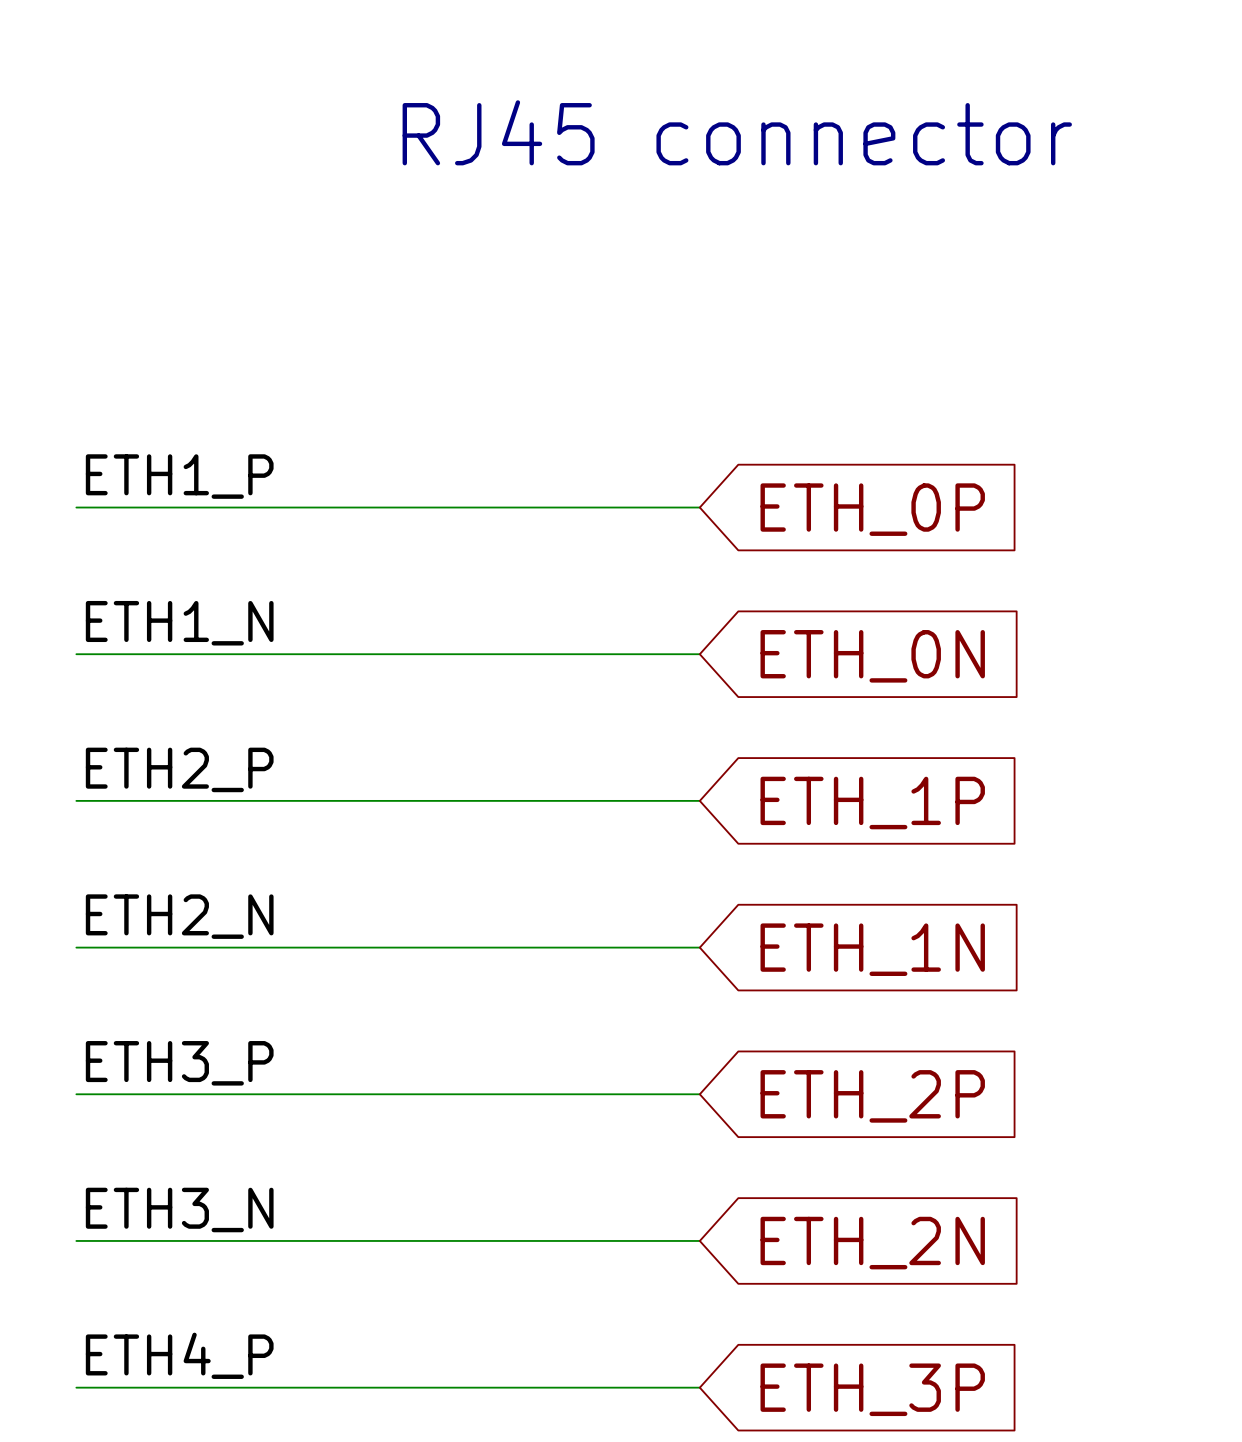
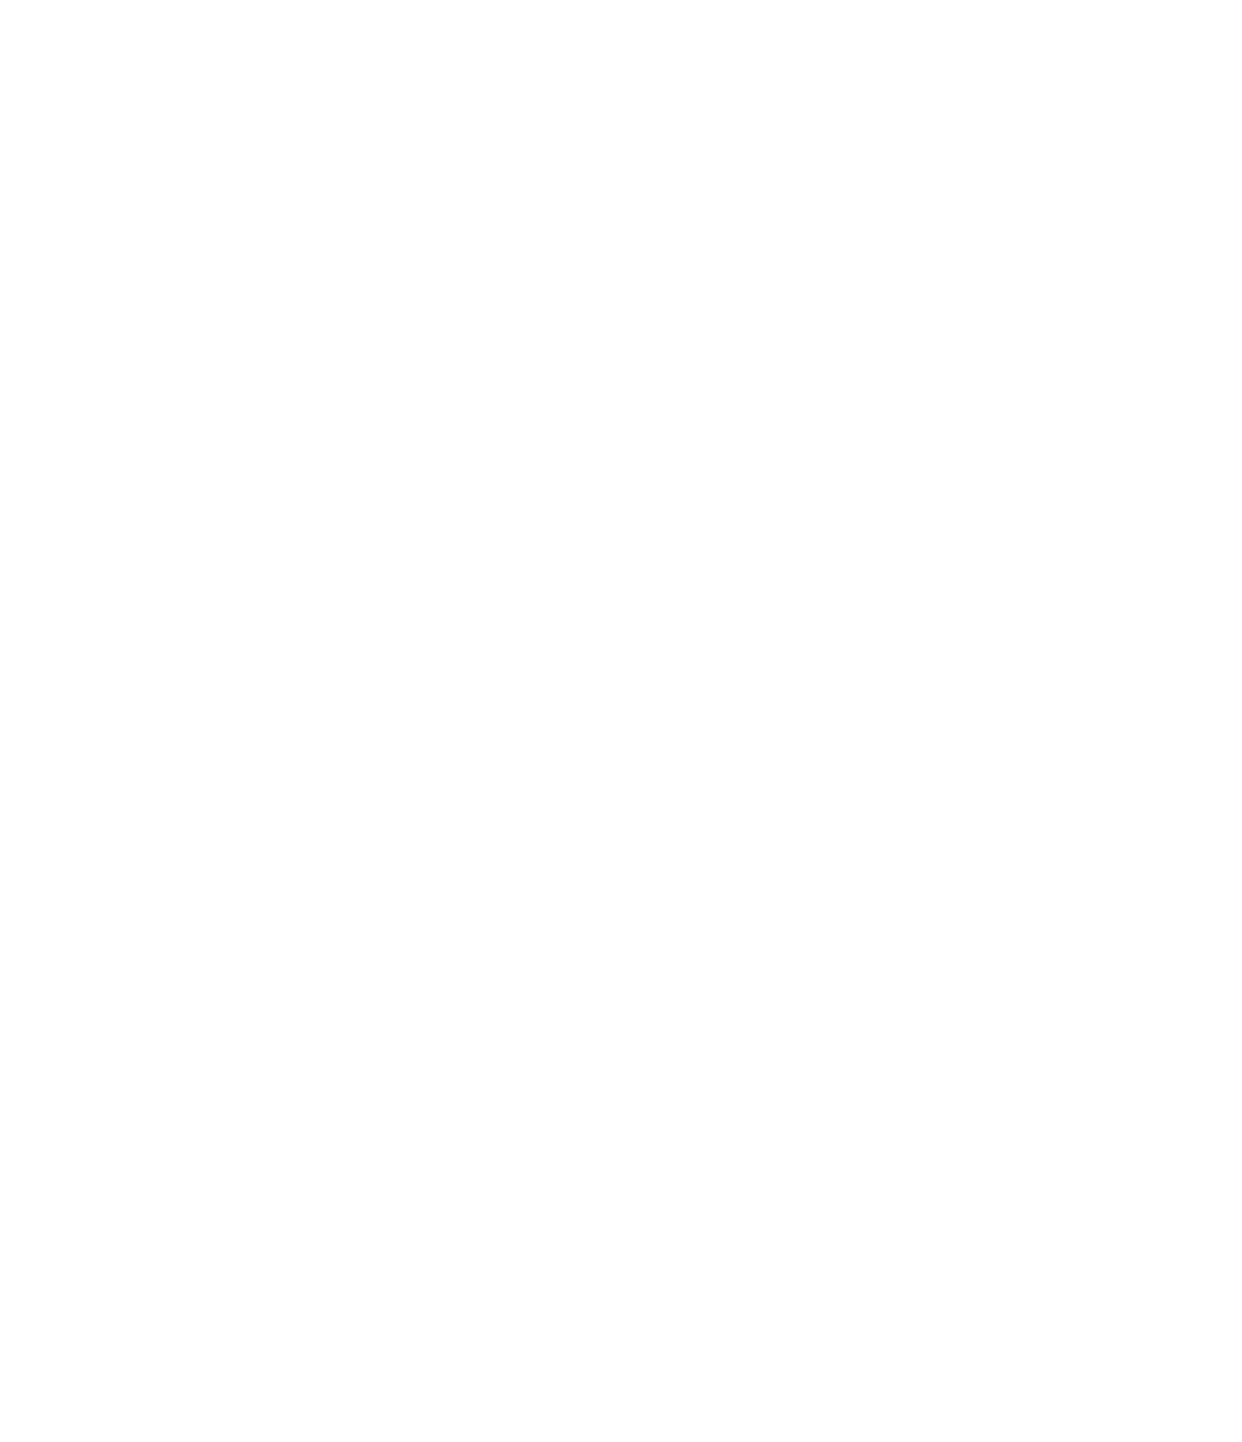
text: RJ45 connector (737, 132) -> none
label: ETH1_P (179, 476) -> none
wire: (76, 507) (699, 507) -> none
global label: ETH_0P (872, 509) -> none
label: ETH1_N (179, 623) -> none
wire: (76, 654) (699, 654) -> none
global label: ETH_0N (872, 656) -> none
label: ETH2_P (179, 769) -> none
wire: (76, 800) (699, 800) -> none
global label: ETH_1P (872, 803) -> none
label: ETH2_N (179, 916) -> none
wire: (76, 947) (699, 947) -> none
global label: ETH_1N (872, 949) -> none
label: ETH3_P (179, 1063) -> none
wire: (76, 1094) (699, 1094) -> none
global label: ETH_2P (872, 1096) -> none
label: ETH3_N (179, 1209) -> none
wire: (76, 1240) (699, 1240) -> none
global label: ETH_2N (872, 1243) -> none
label: ETH4_P (179, 1355) -> none
wire: (76, 1387) (699, 1387) -> none
global label: ETH_3P (872, 1389) -> none

